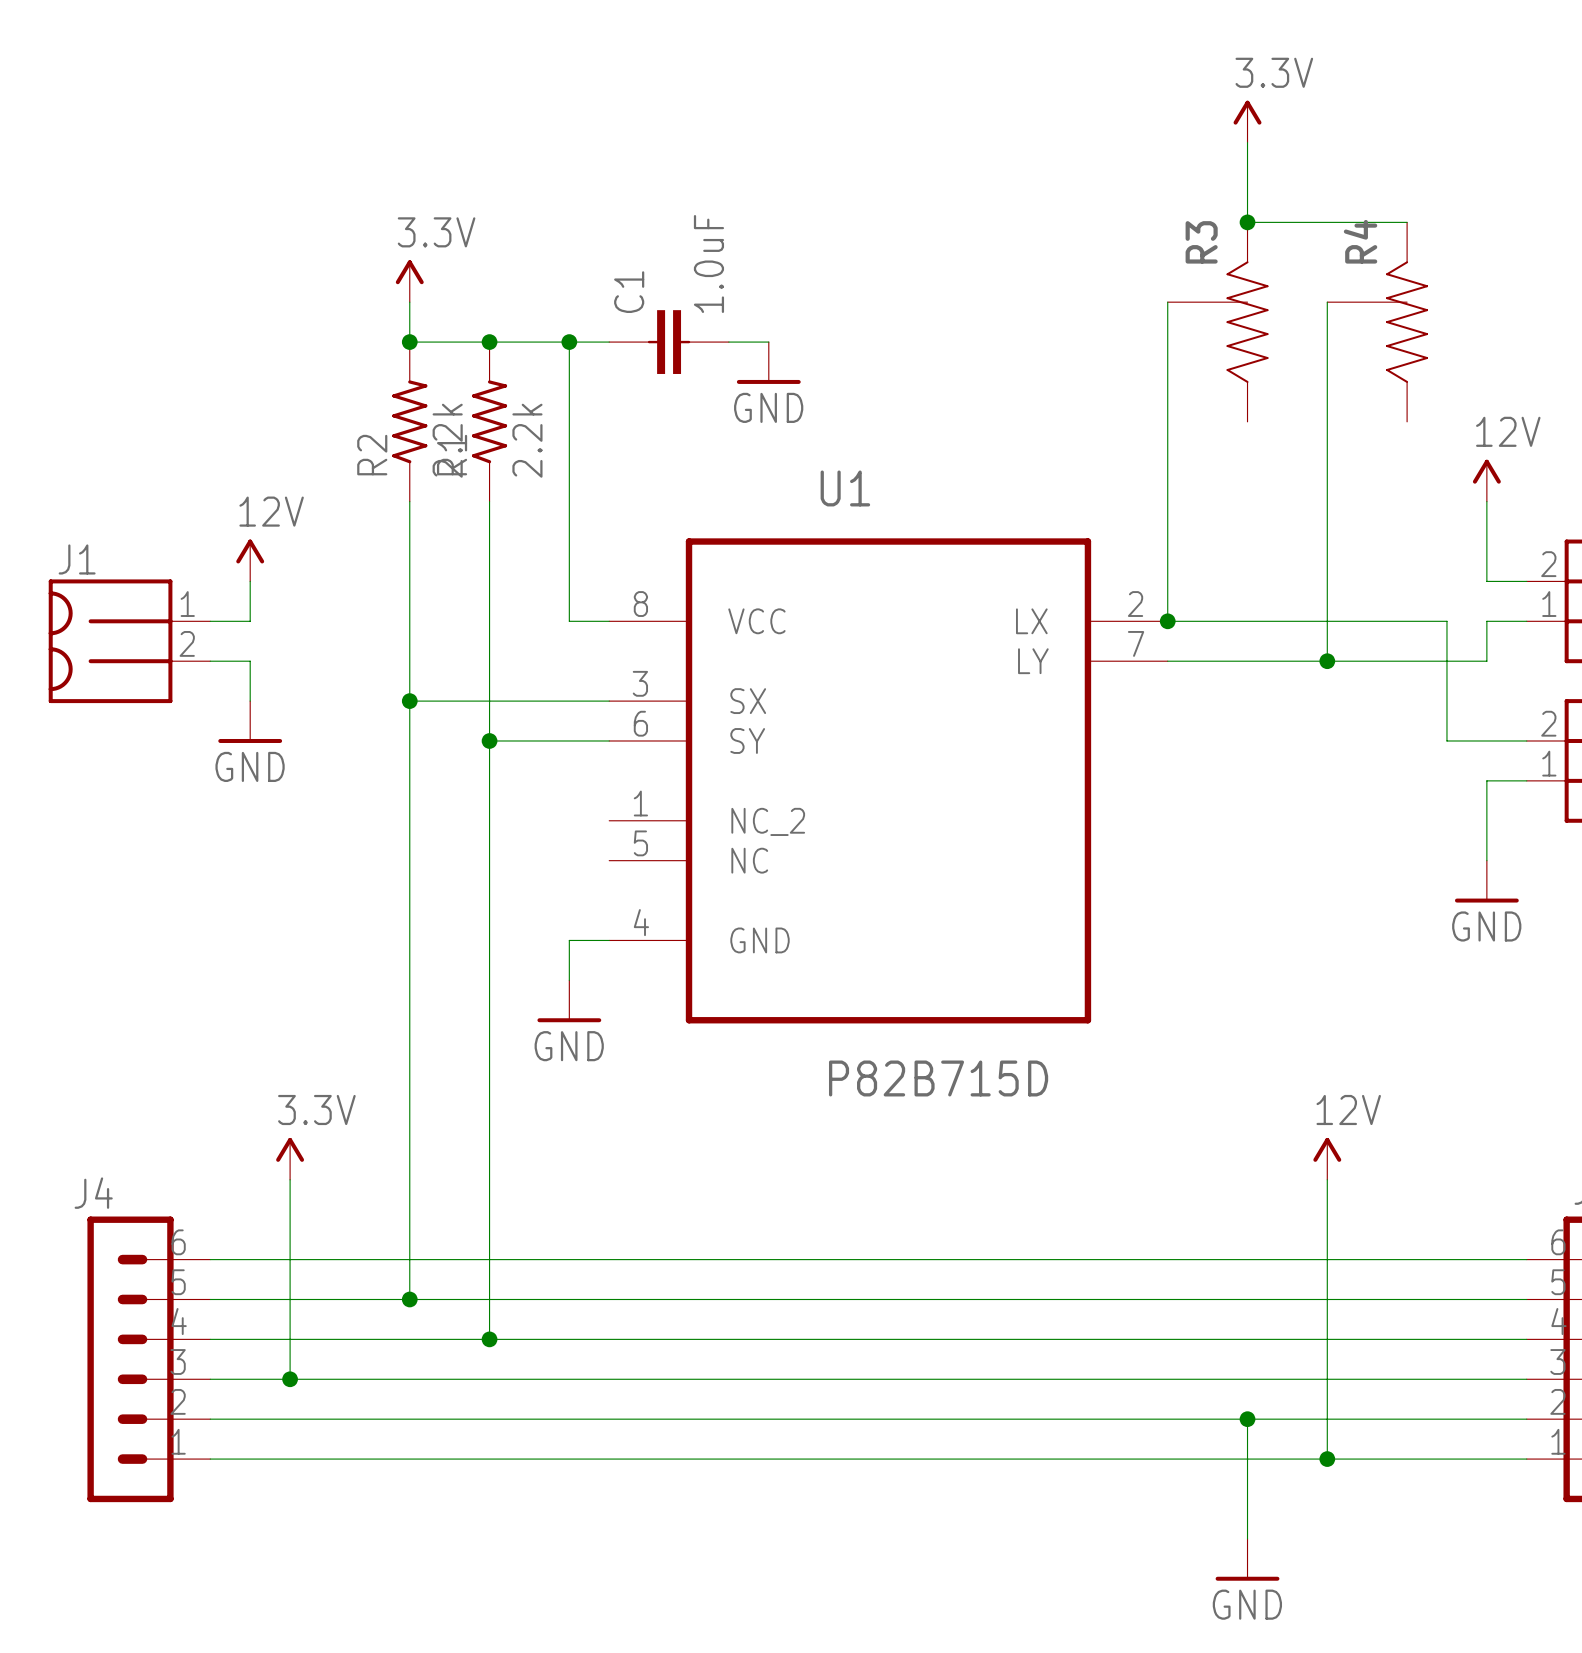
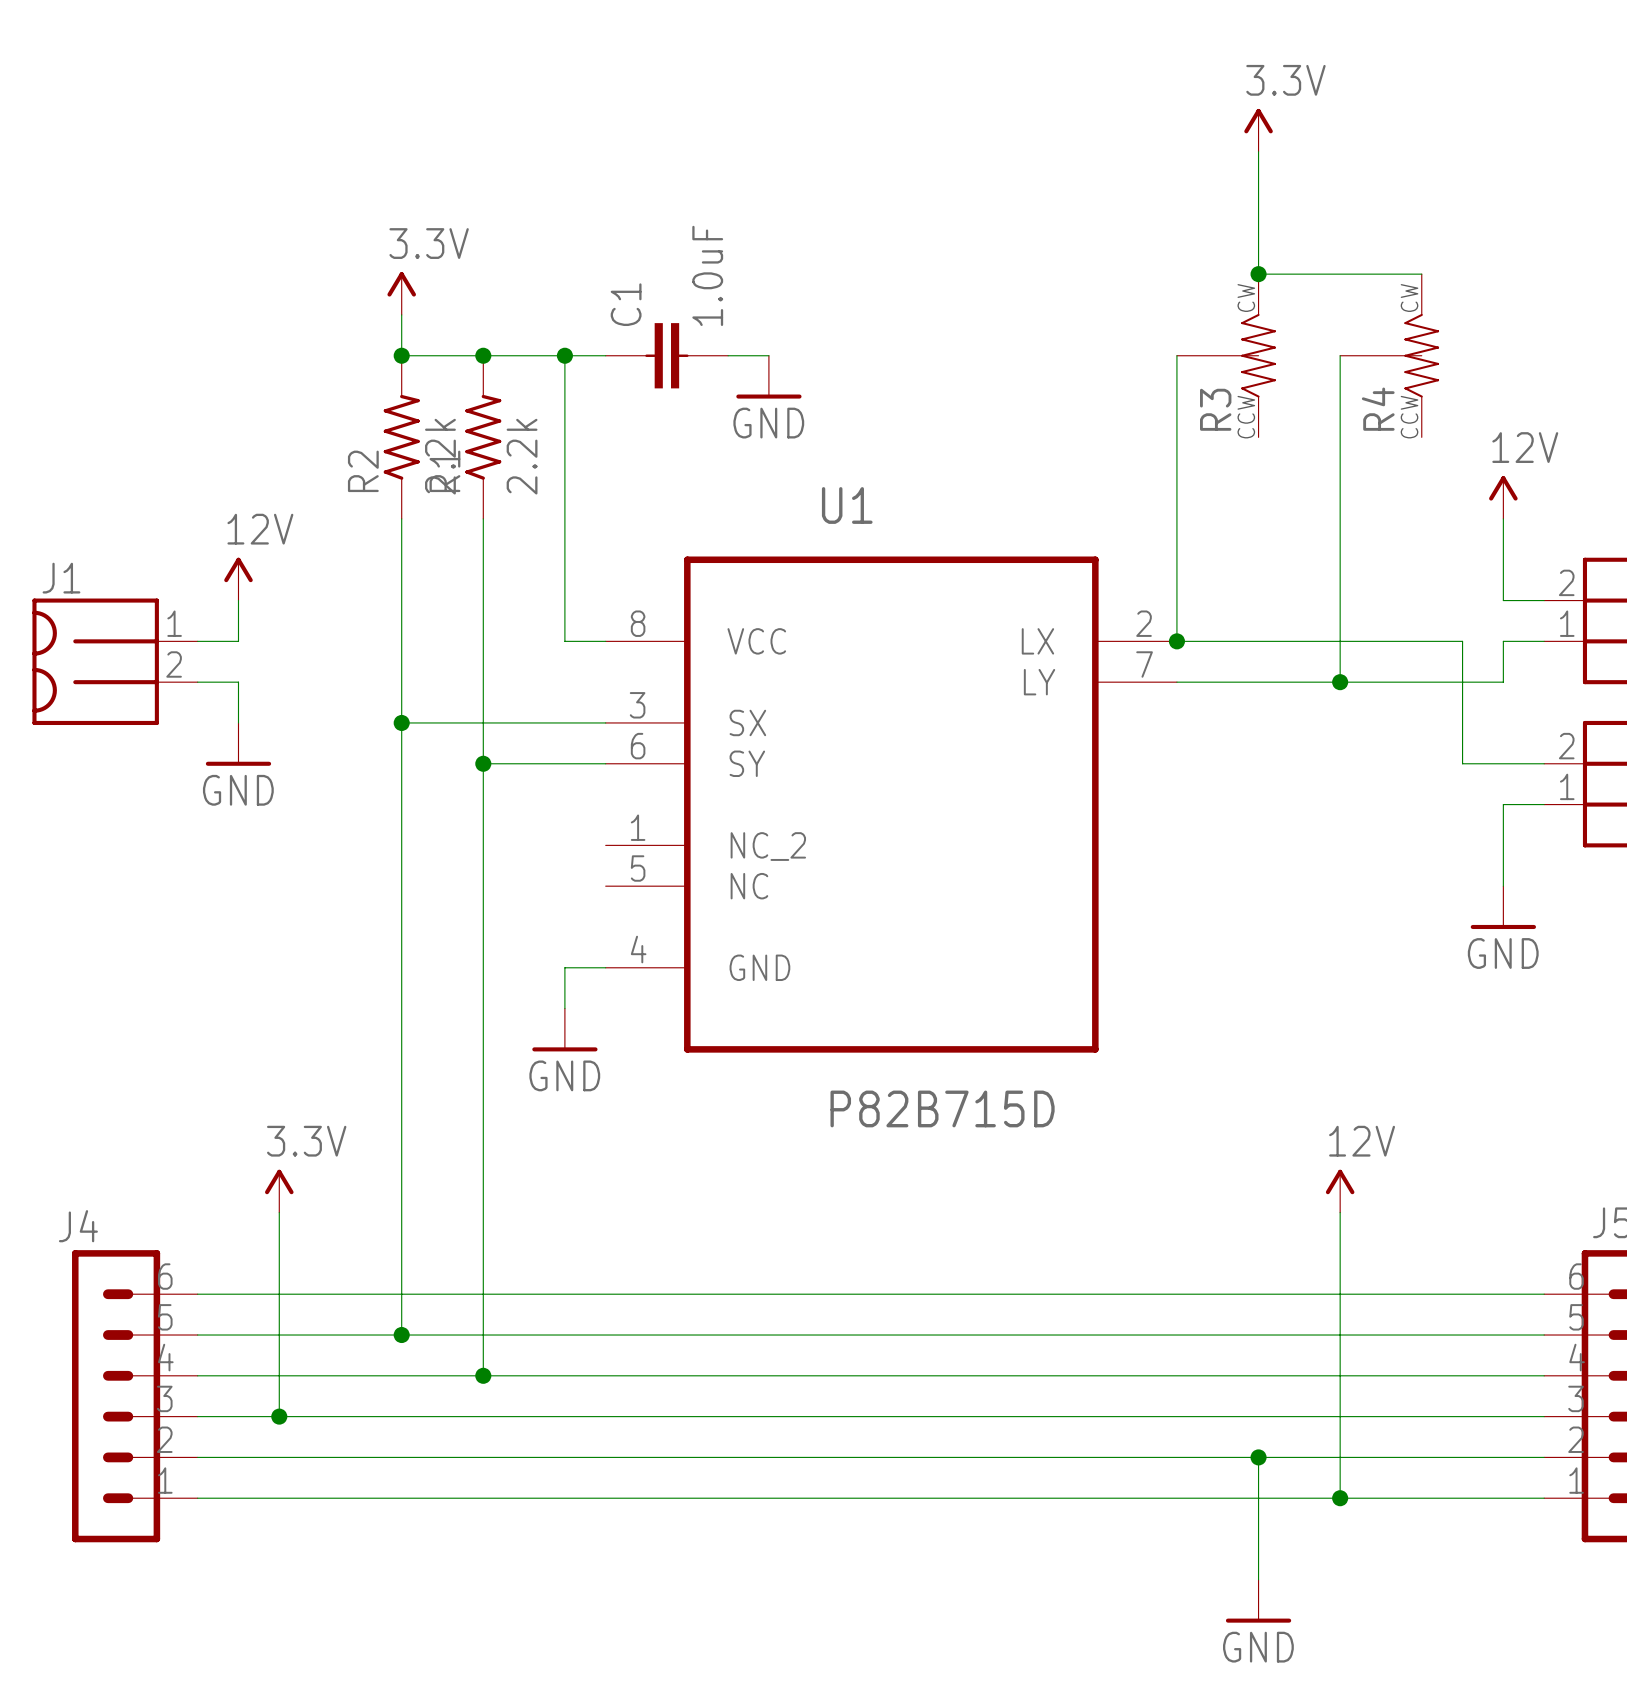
R3 symbol: [1167, 222, 1269, 422] -> [1176, 274, 1276, 438]
wire: (1247, 222) (1407, 222) -> (1258, 233) (1258, 274) (1421, 274)
junction position: (1247, 222) -> (1258, 274)
R4 symbol: [1327, 222, 1429, 422] -> [1340, 274, 1440, 438]
R4 name position: R4 (1360, 241) -> R4 (1378, 409)
R3 name position: R3 (1201, 242) -> R3 (1215, 409)
wire: (1167, 302) (1167, 342) -> none
wire: (1327, 302) (1327, 342) -> none

